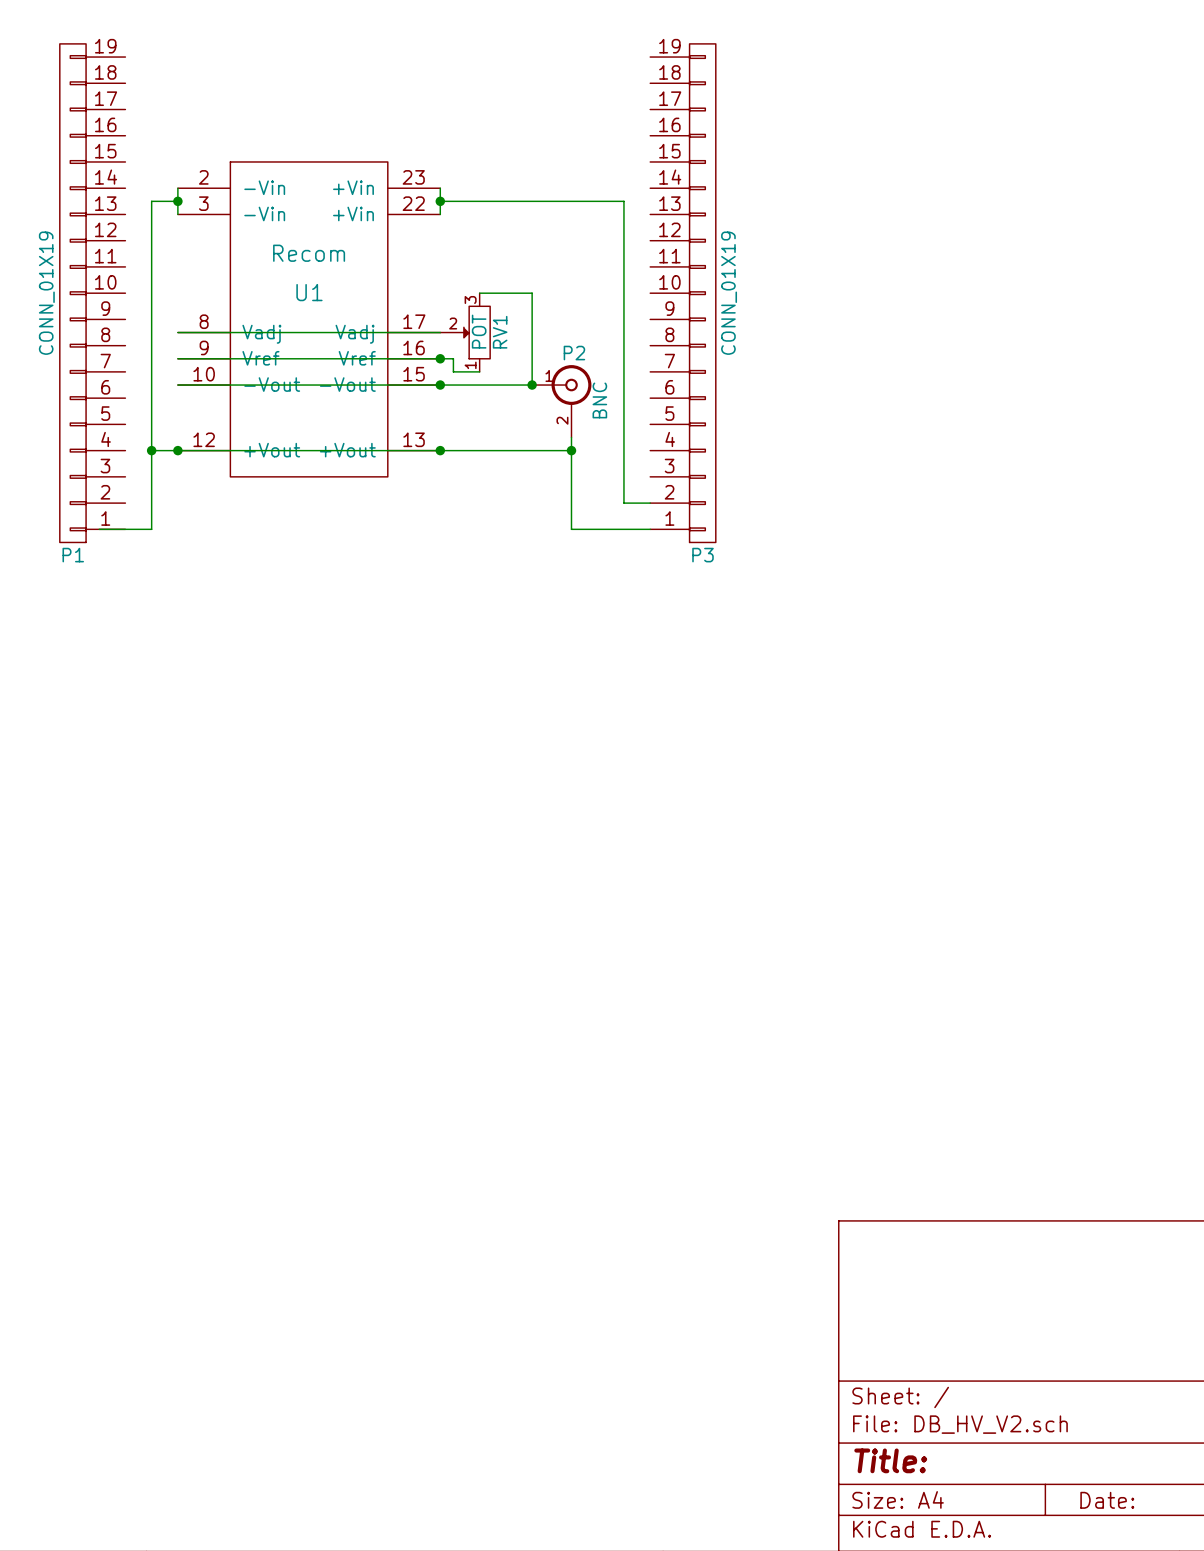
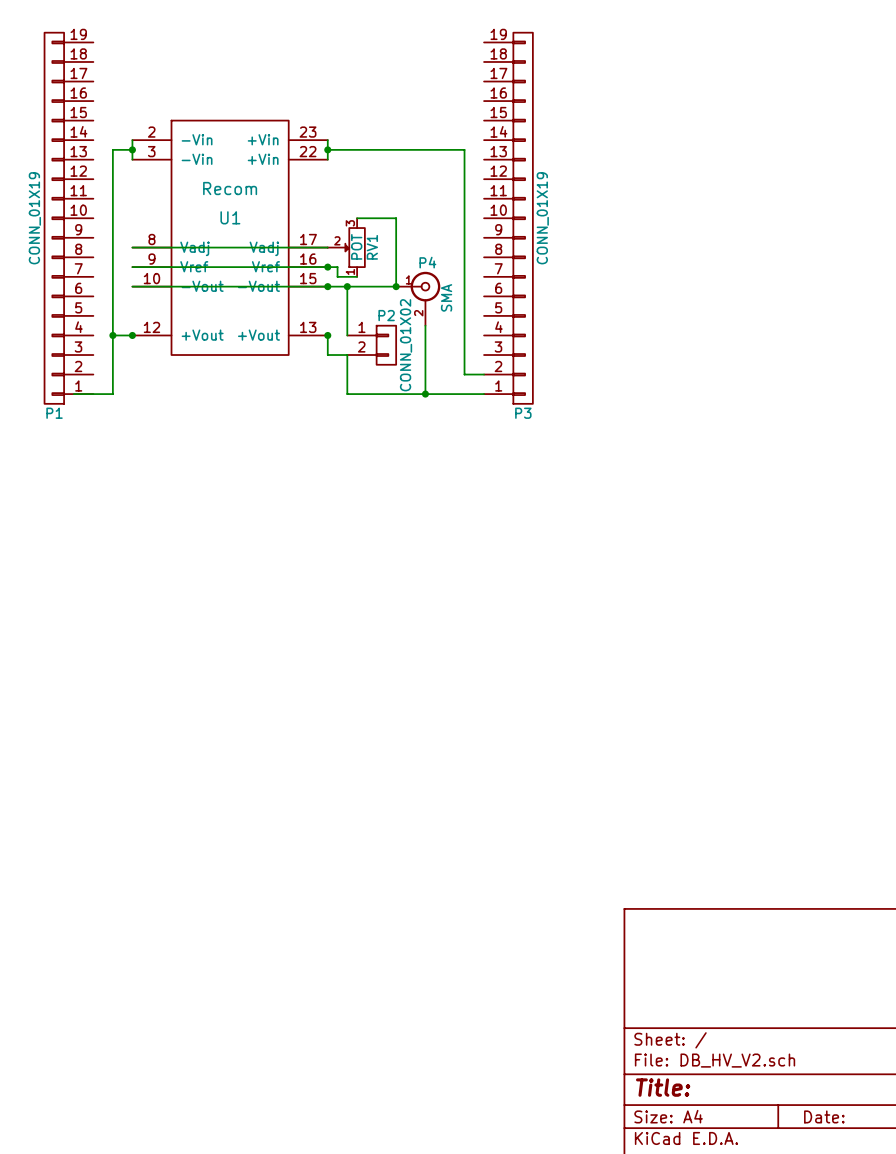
P2 name: P2 (574, 353) -> P4 (427, 262)
wire: none -> (347, 286) (347, 335)
junction: none -> (347, 286)
P2 value: BNC (599, 400) -> SMA (446, 297)
wire: (177, 450) (571, 450) -> none
wire: none -> (327, 335) (327, 355) (347, 355) (347, 394) (425, 394)
junction: (571, 450) -> none
P2: none -> CONN_01X02 (371, 345)
junction: none -> (425, 394)

